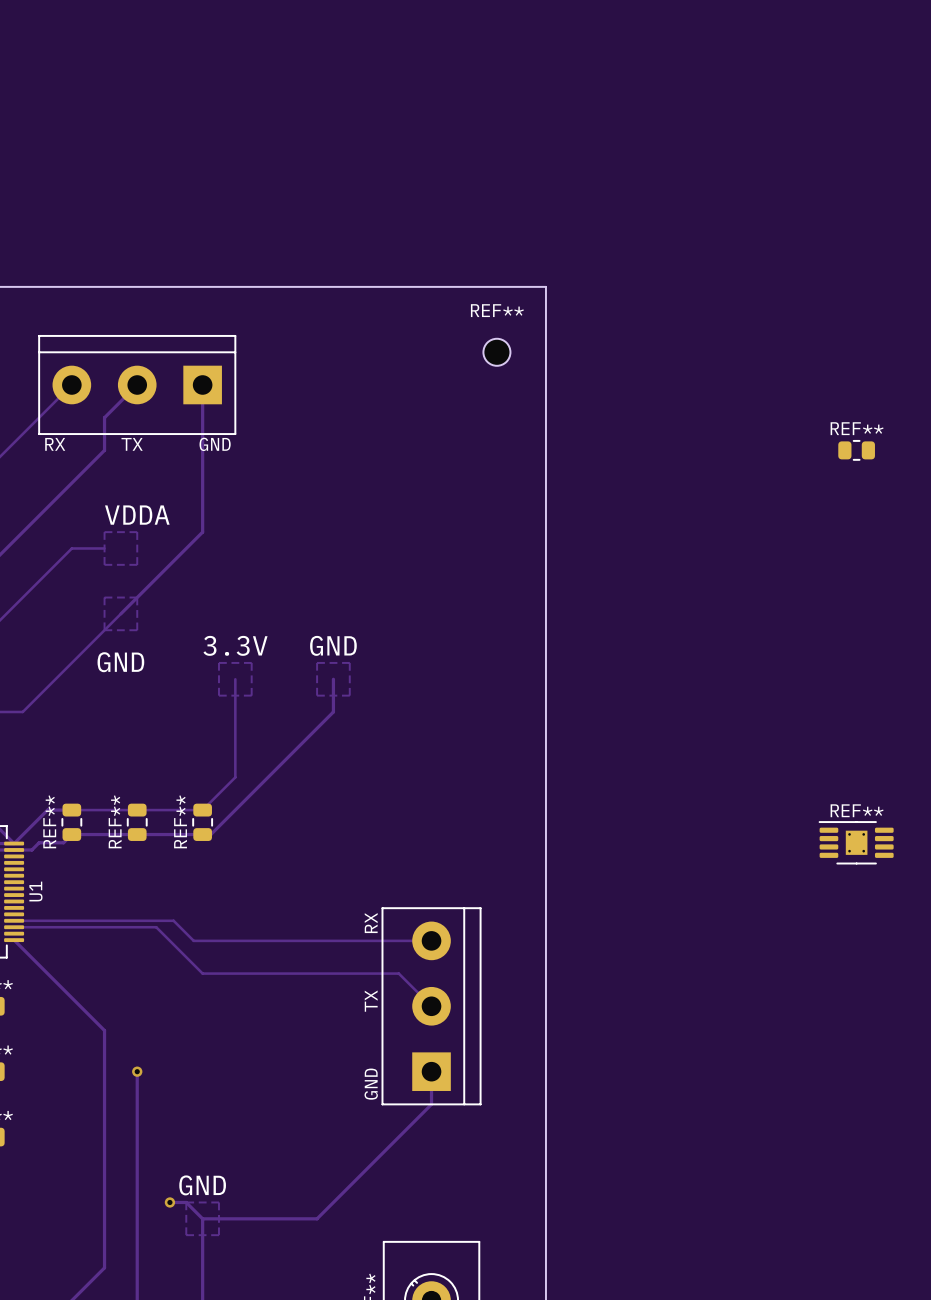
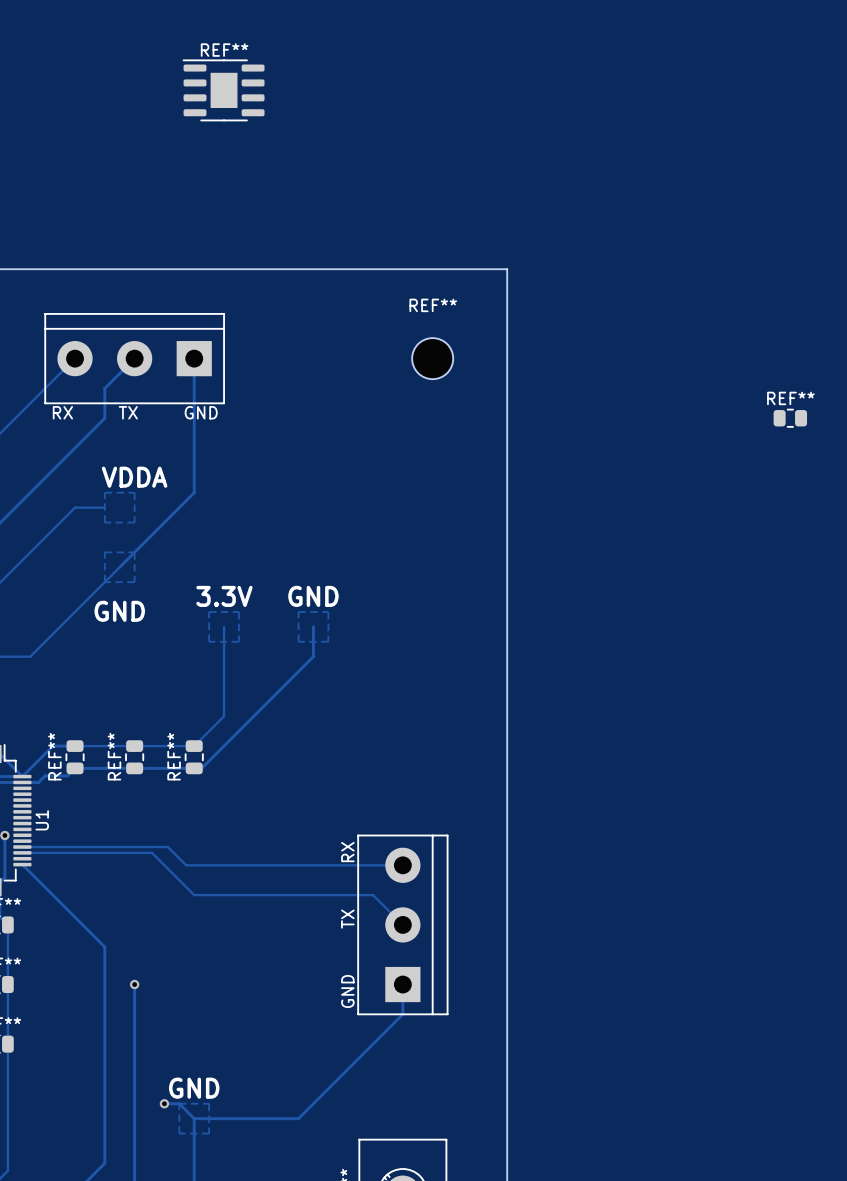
REF**: none -> (223, 90)
REF**: (496, 352) -> none
REF**: none -> (432, 358)
REF**: (856, 842) -> none

